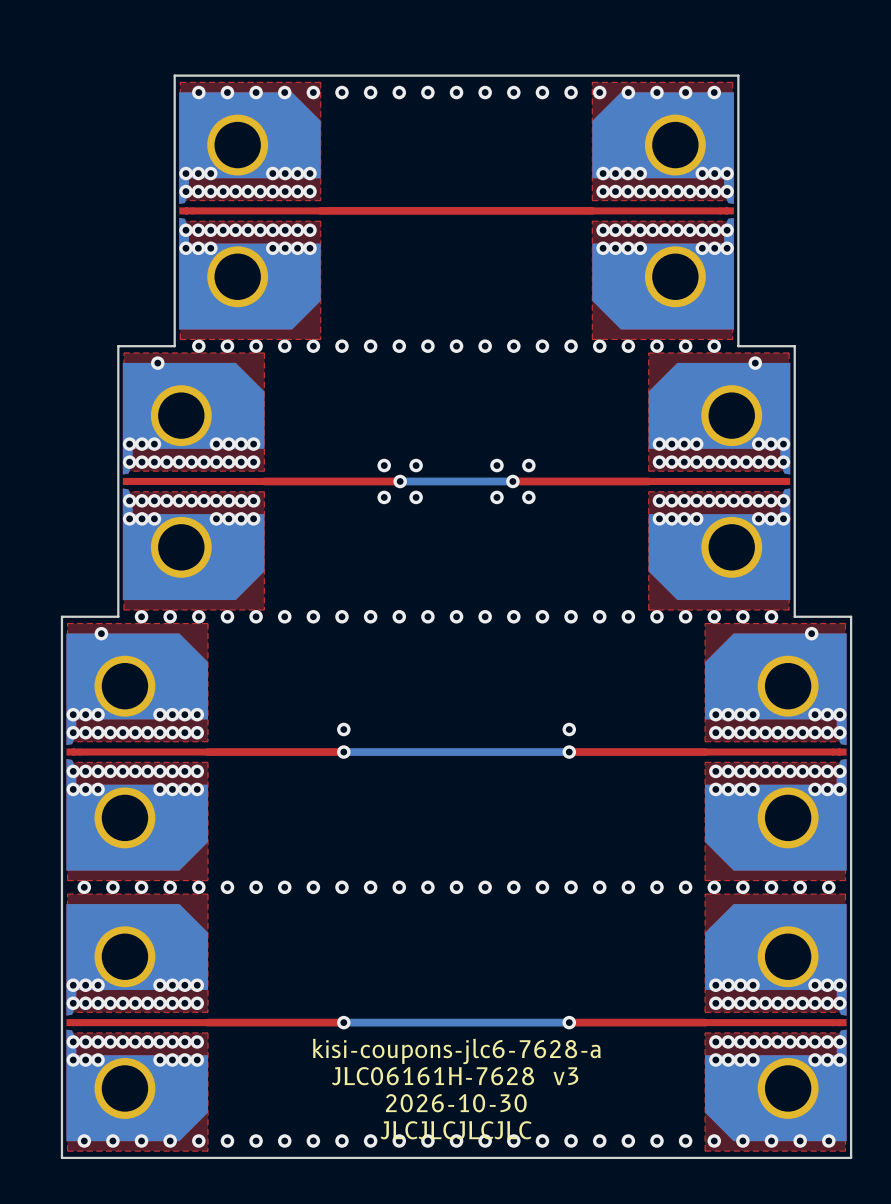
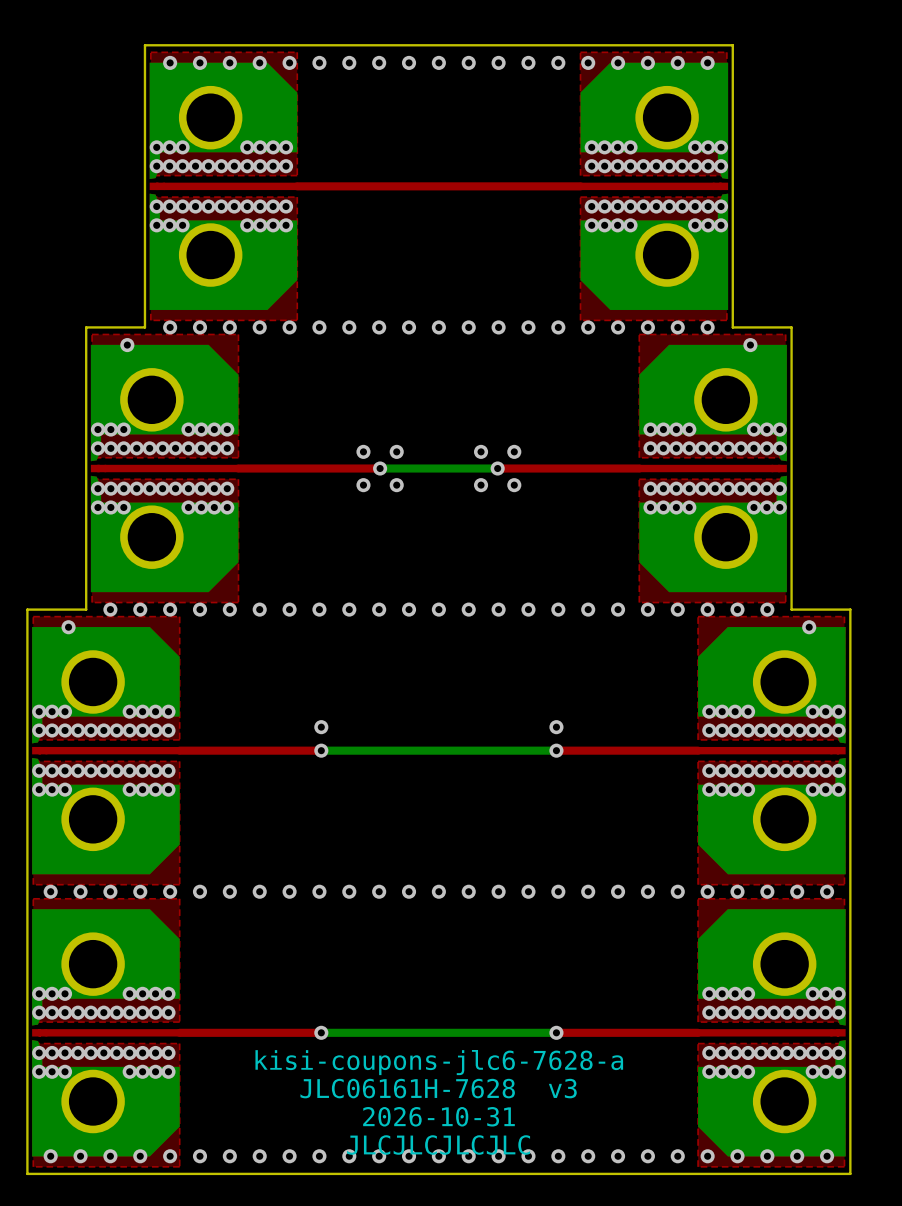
text: 2026-10-30 (456, 1103) -> 2026-10-31 (438, 1116)

